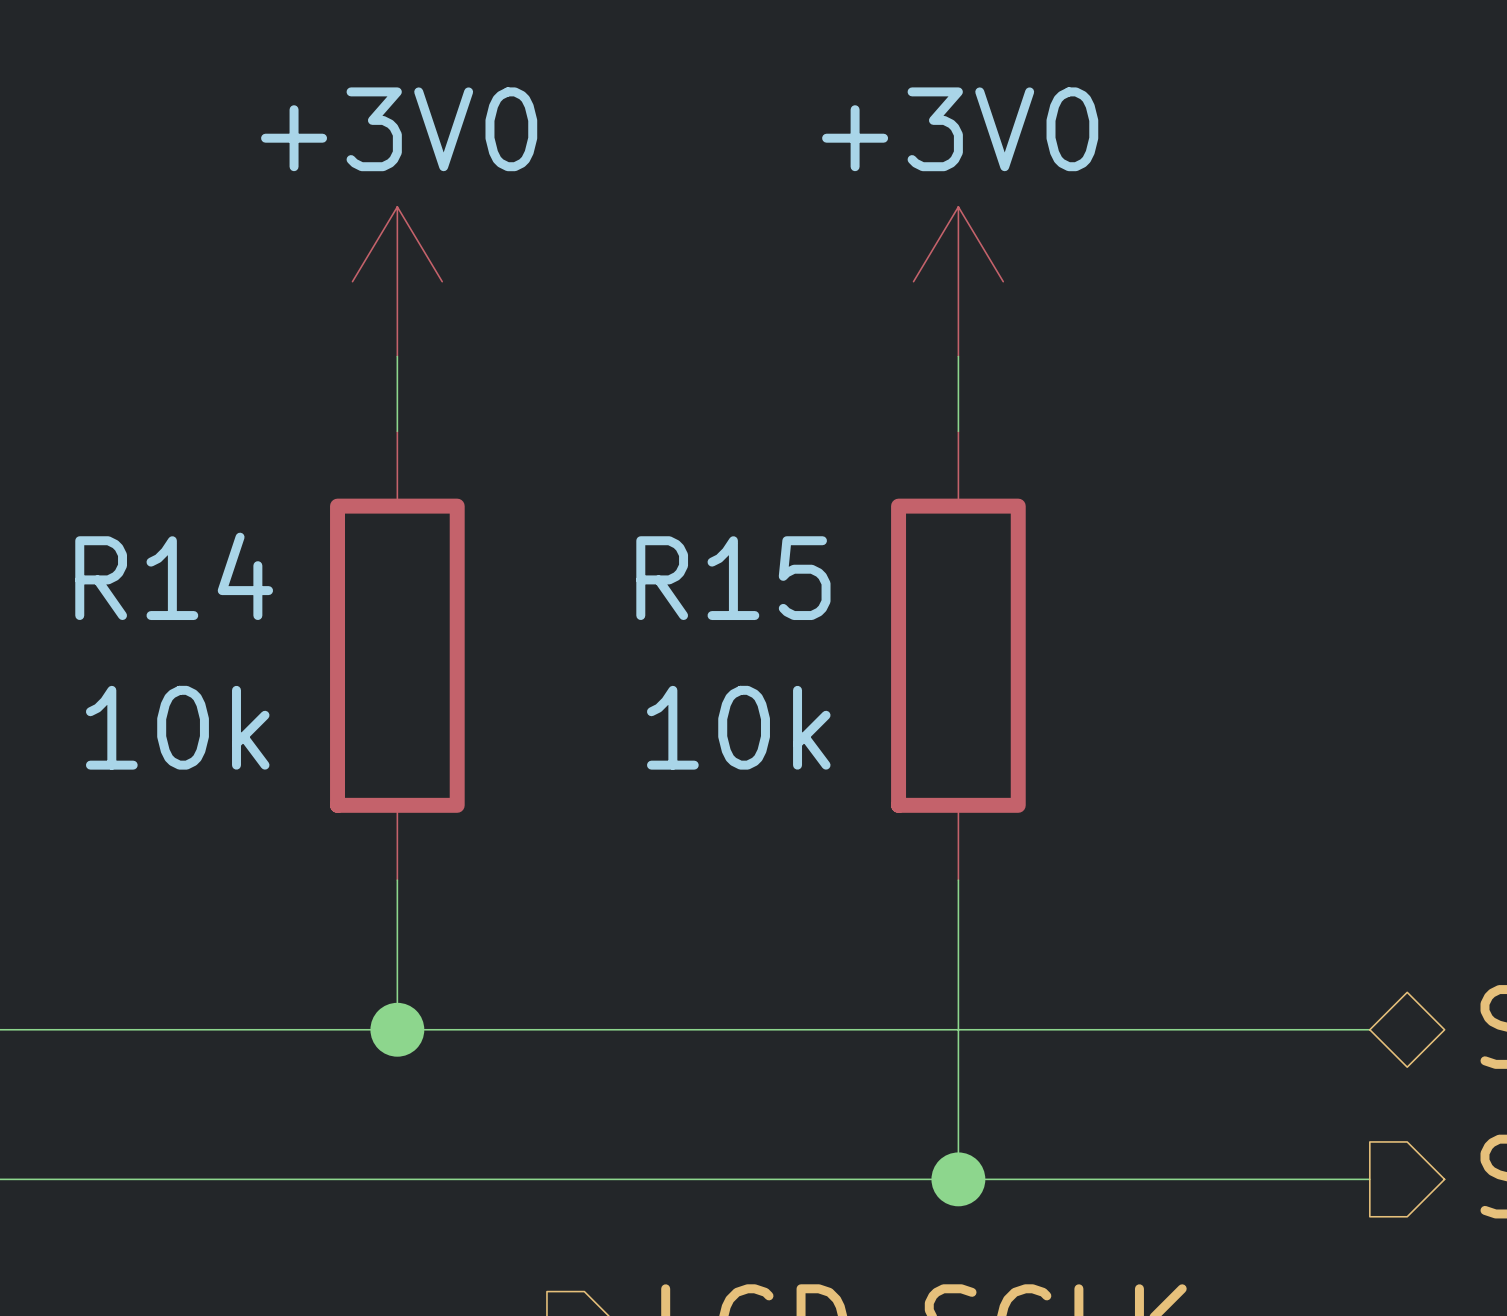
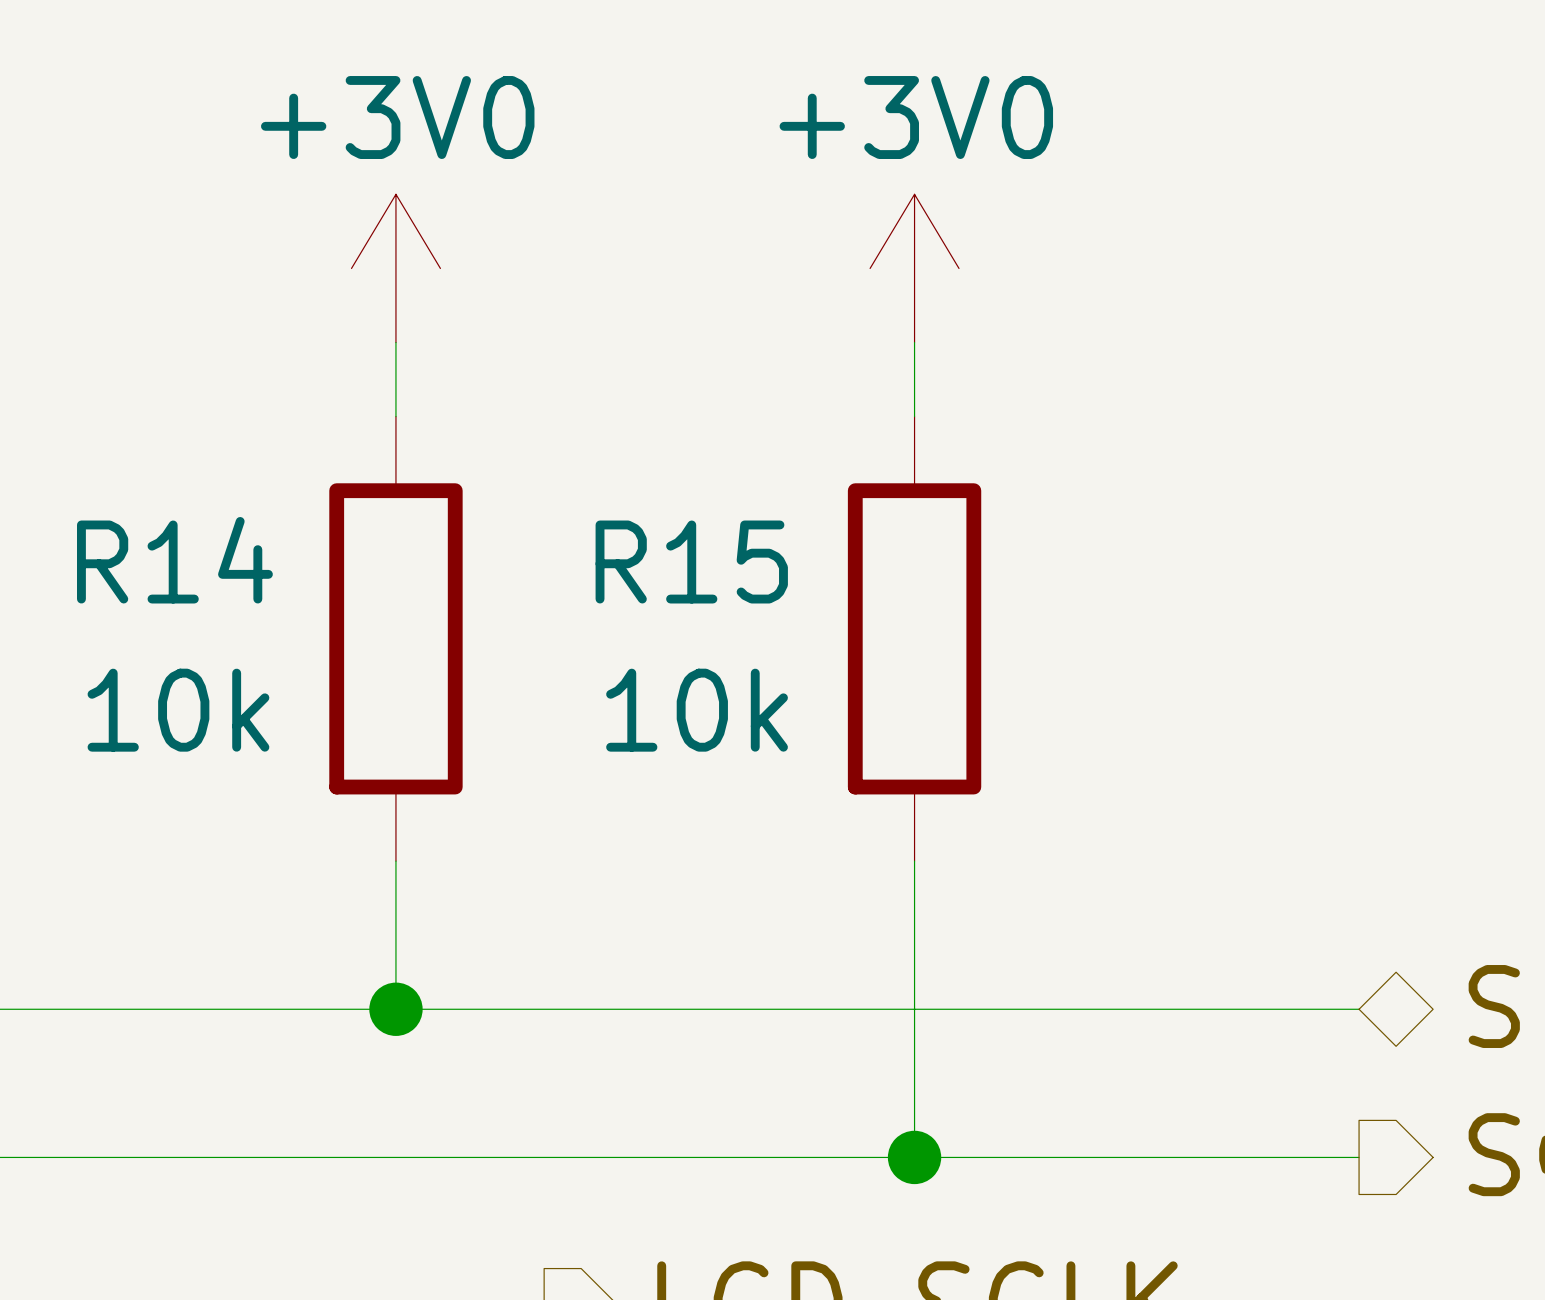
power symbol position: +3V0 (958, 281) -> +3V0 (914, 268)
wire: (958, 356) (958, 431) -> (914, 342) (914, 416)
R15 position: (958, 655) -> (914, 638)
wire: (958, 880) (958, 1179) -> (914, 861) (914, 1157)
junction position: (958, 1179) -> (914, 1157)

